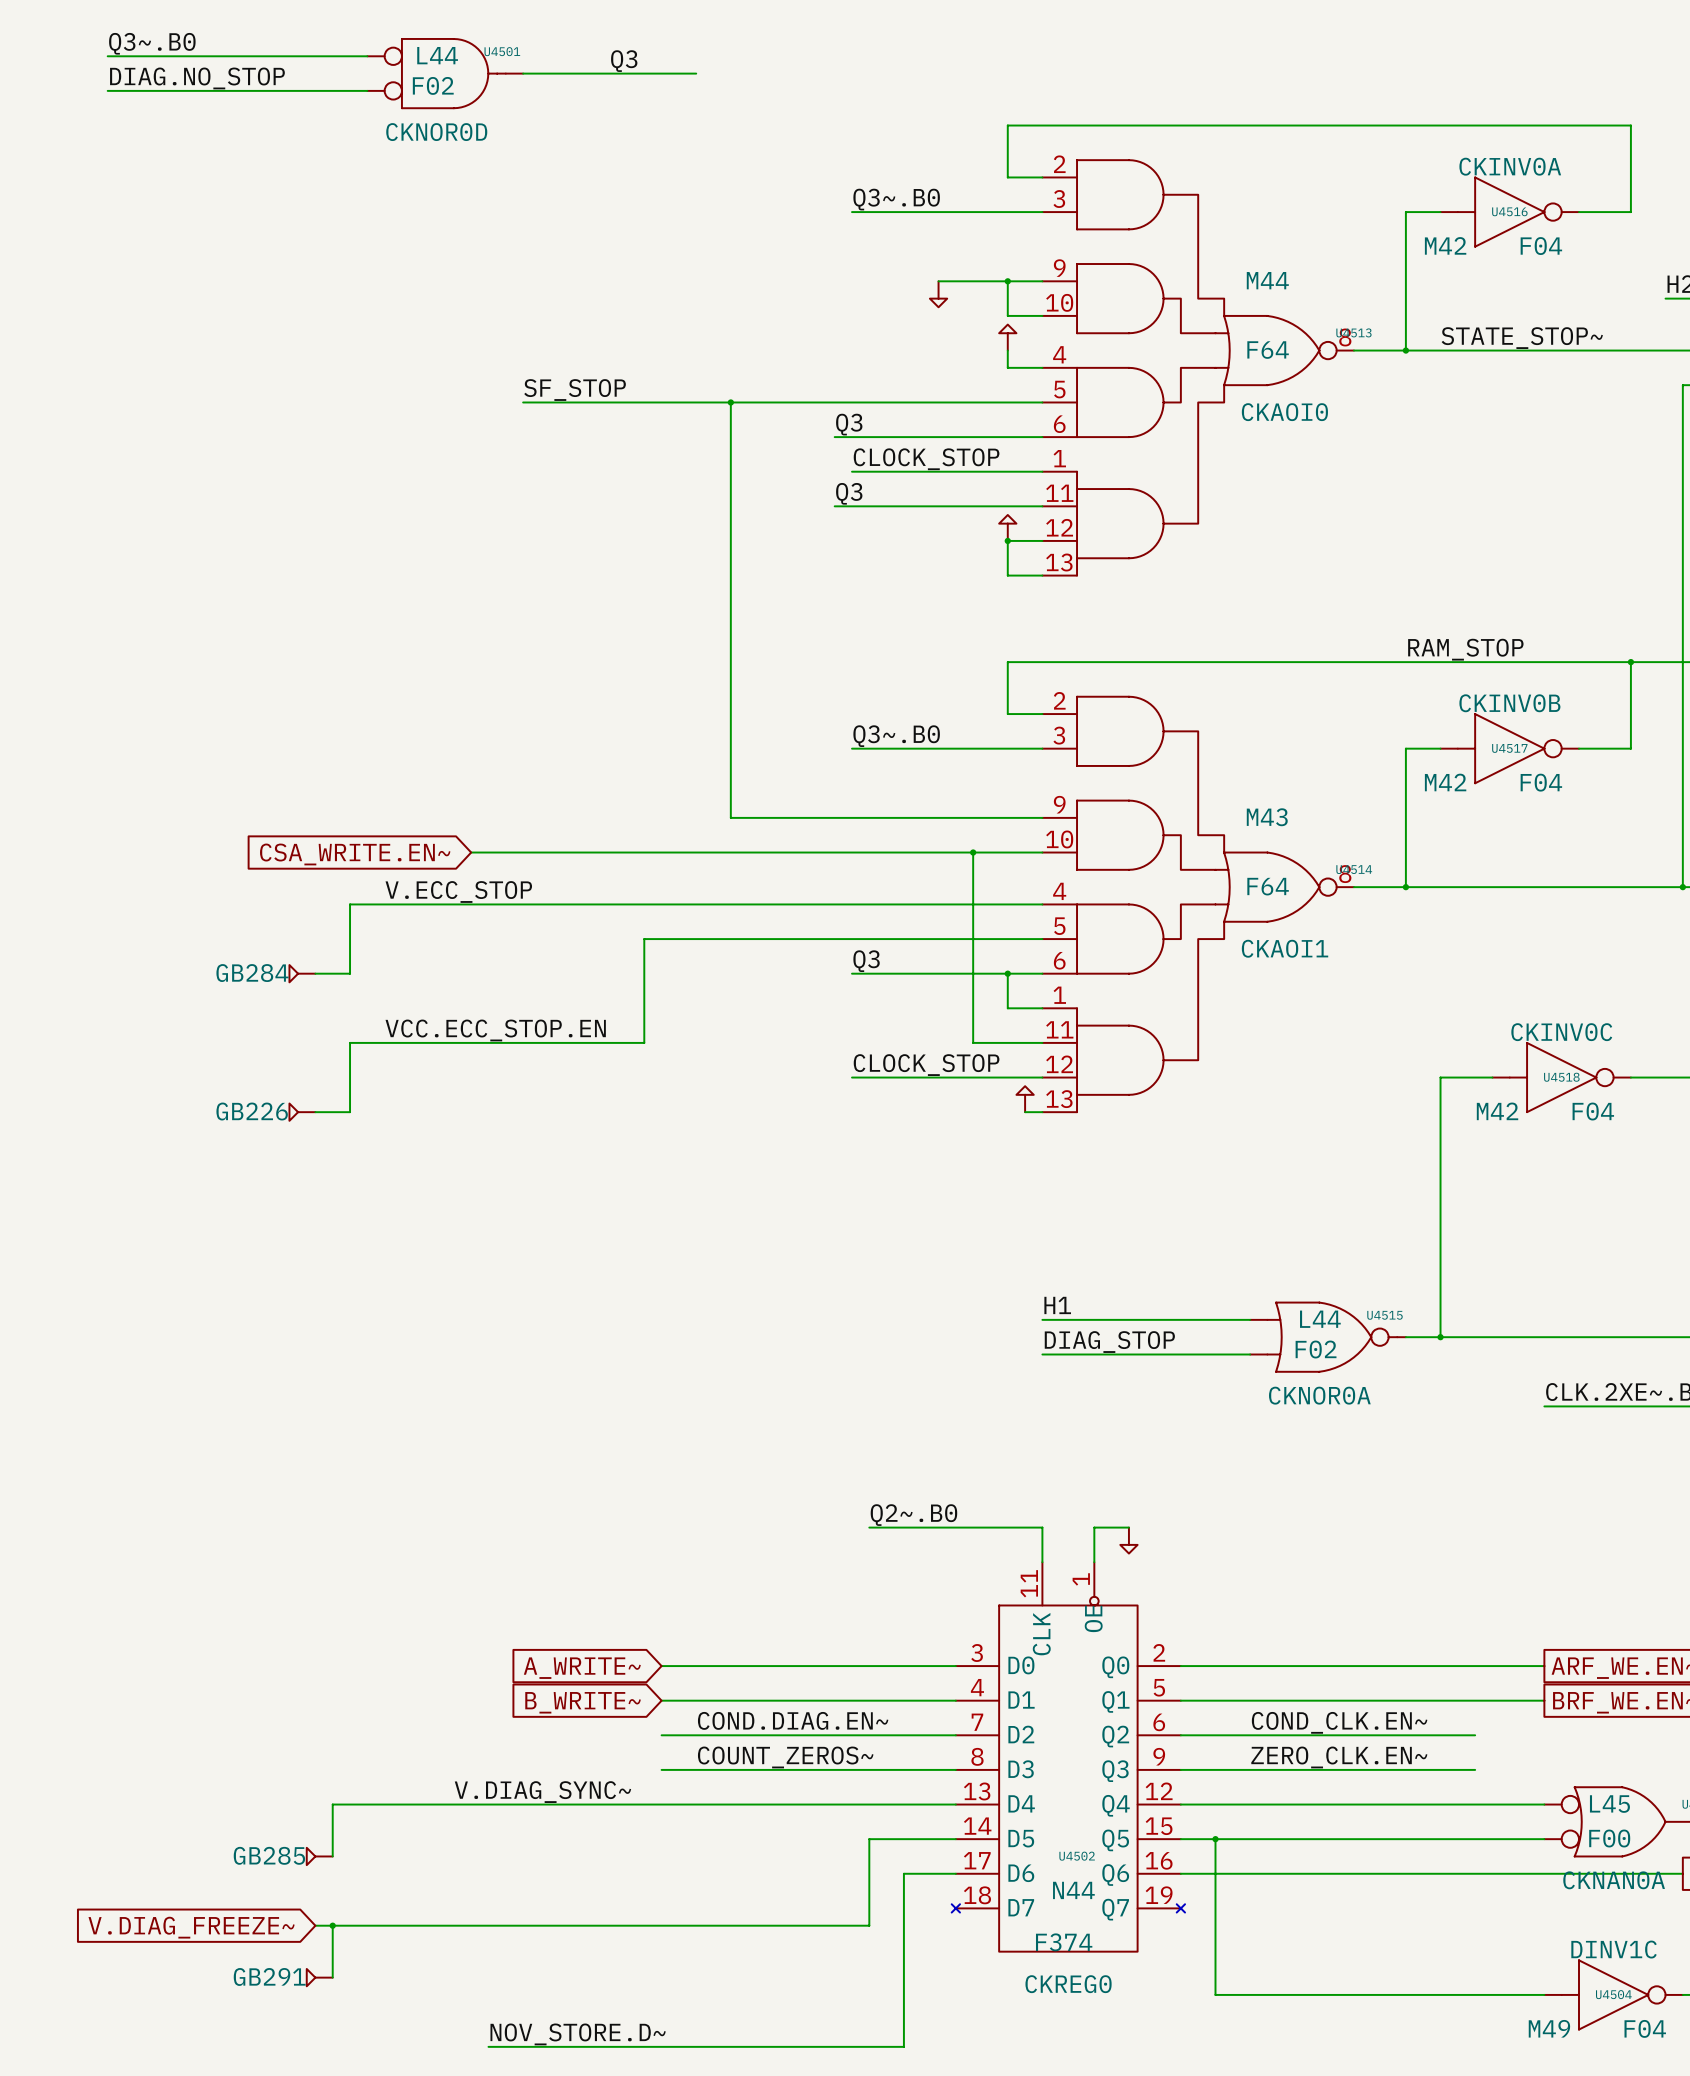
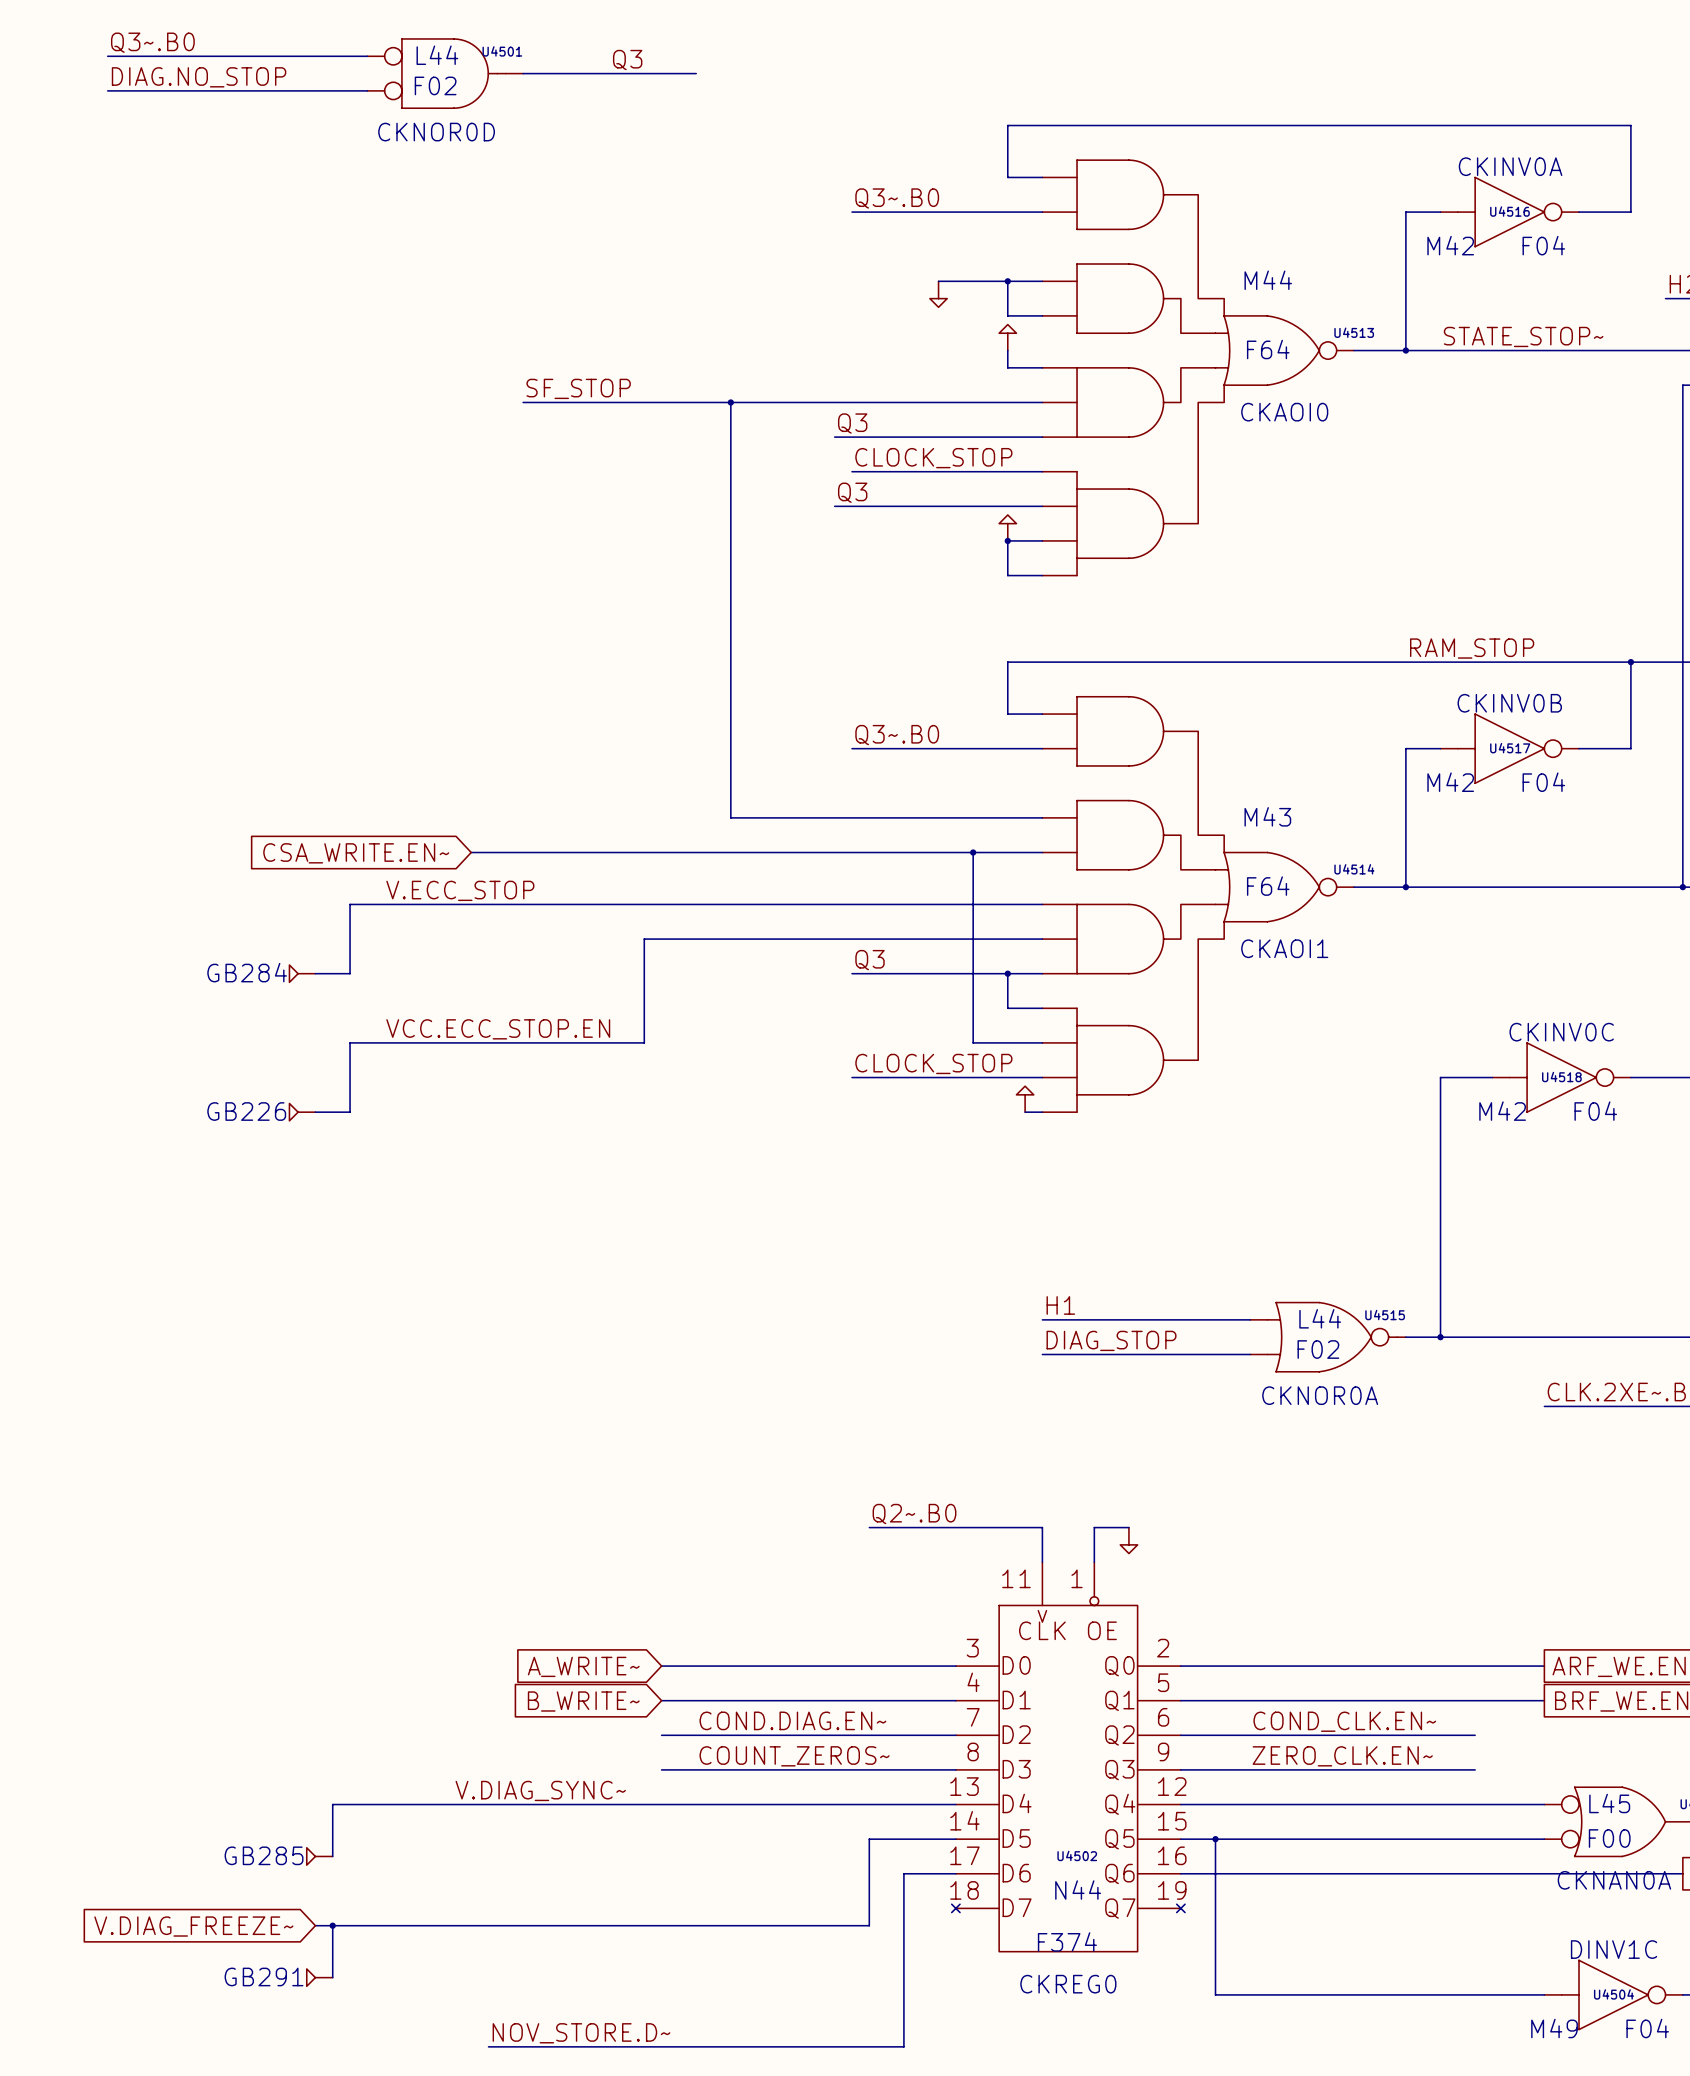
U4513 symbol: [1042, 159, 1354, 577] -> [1042, 159, 1354, 577]
U4514 symbol: [1042, 696, 1354, 1113] -> [1042, 696, 1354, 1113]
U4502 symbol: [955, 1562, 1181, 1952] -> [955, 1562, 1181, 1952]

